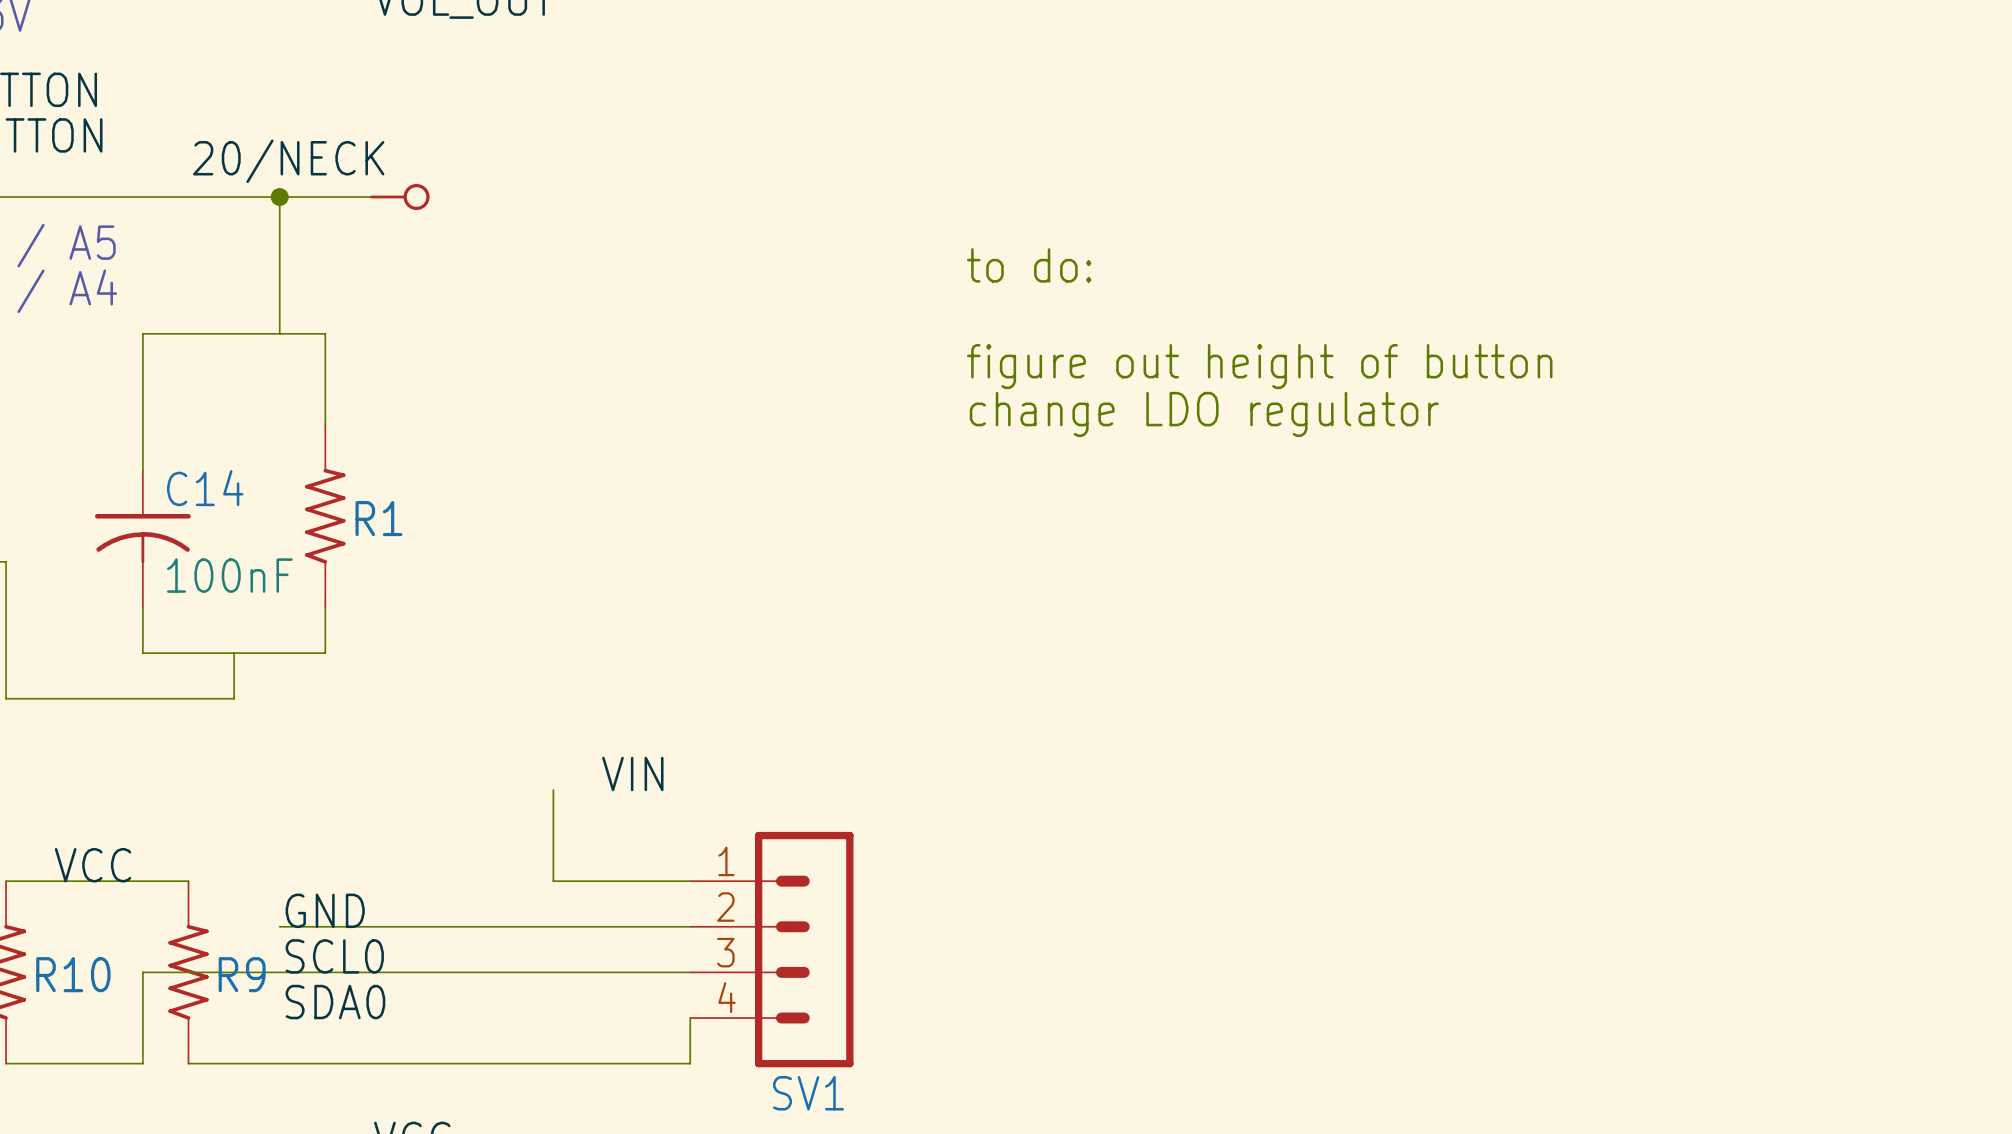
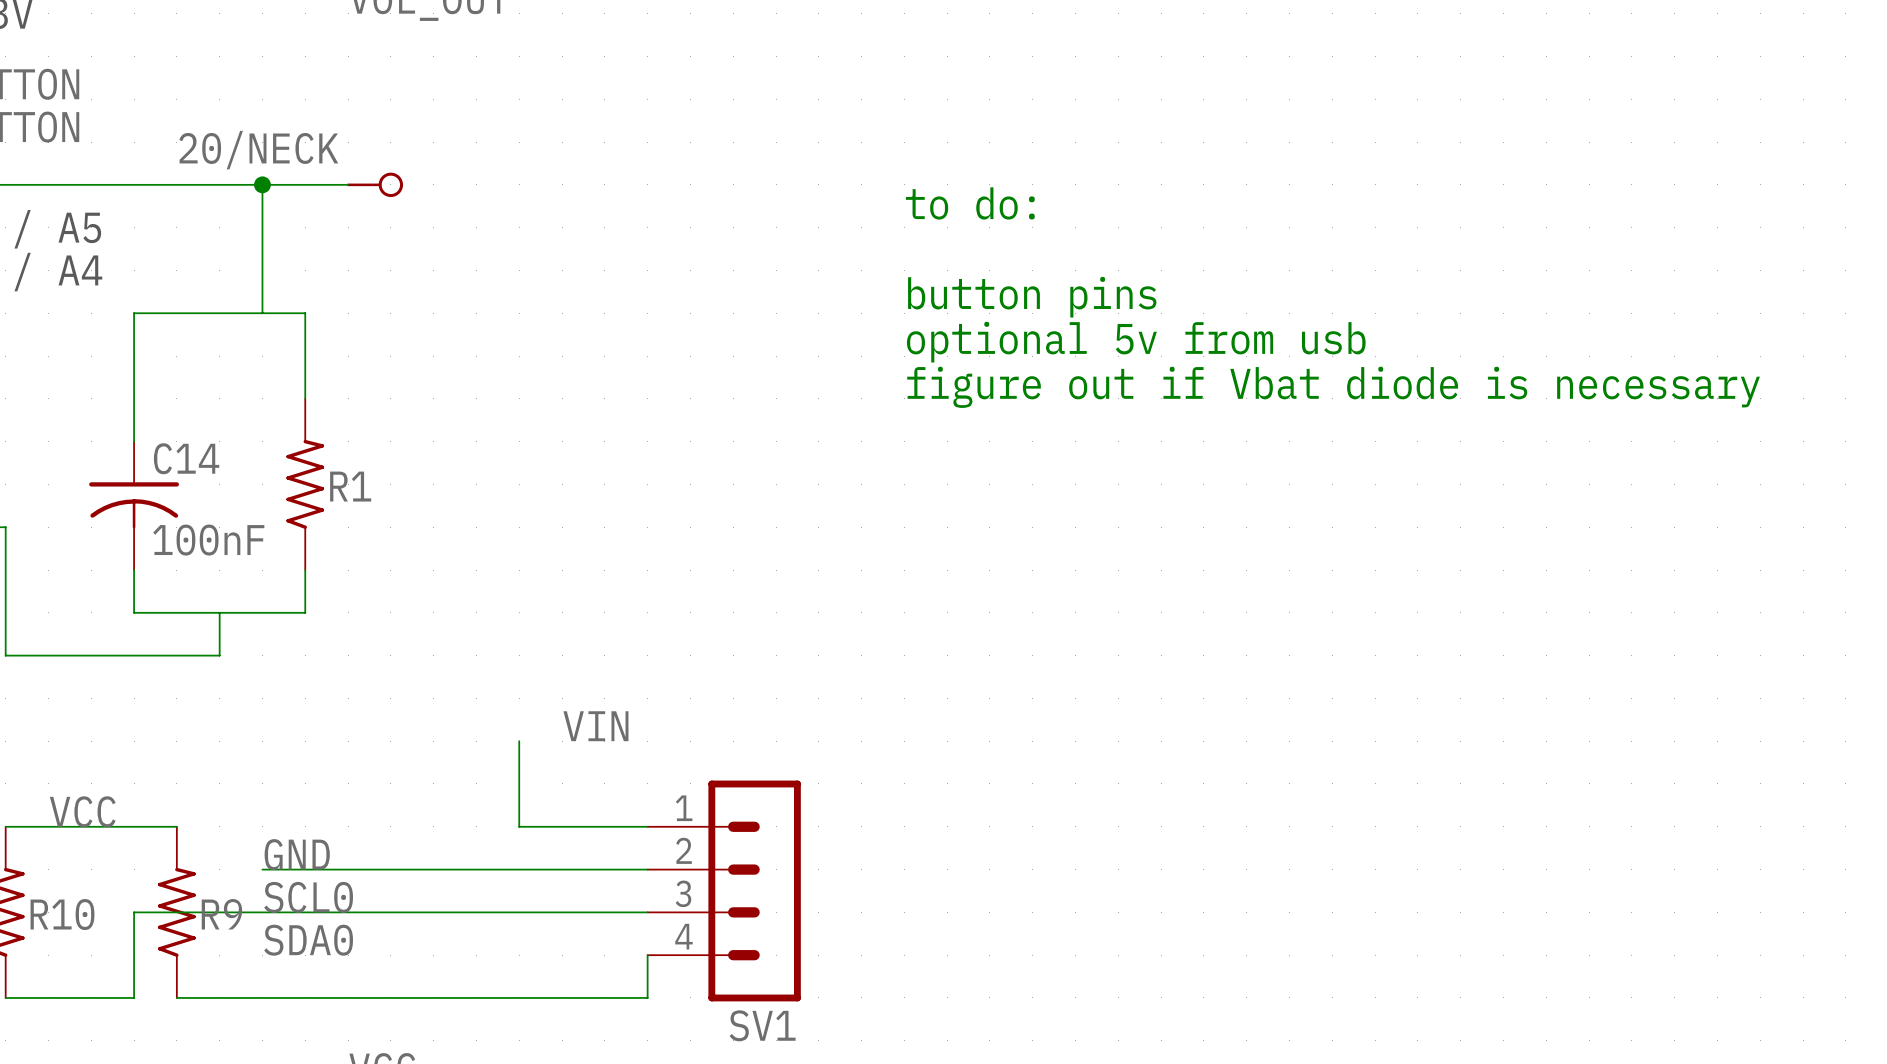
text position: to do: (1029, 265) -> to do: (970, 203)
text: none -> button pins (1032, 297)
text: figure out height of button (1259, 366) -> optional 5v from usb (1136, 342)
text: change LDO regulator (1204, 414) -> figure out if Vbat diode is necessary (1333, 387)

